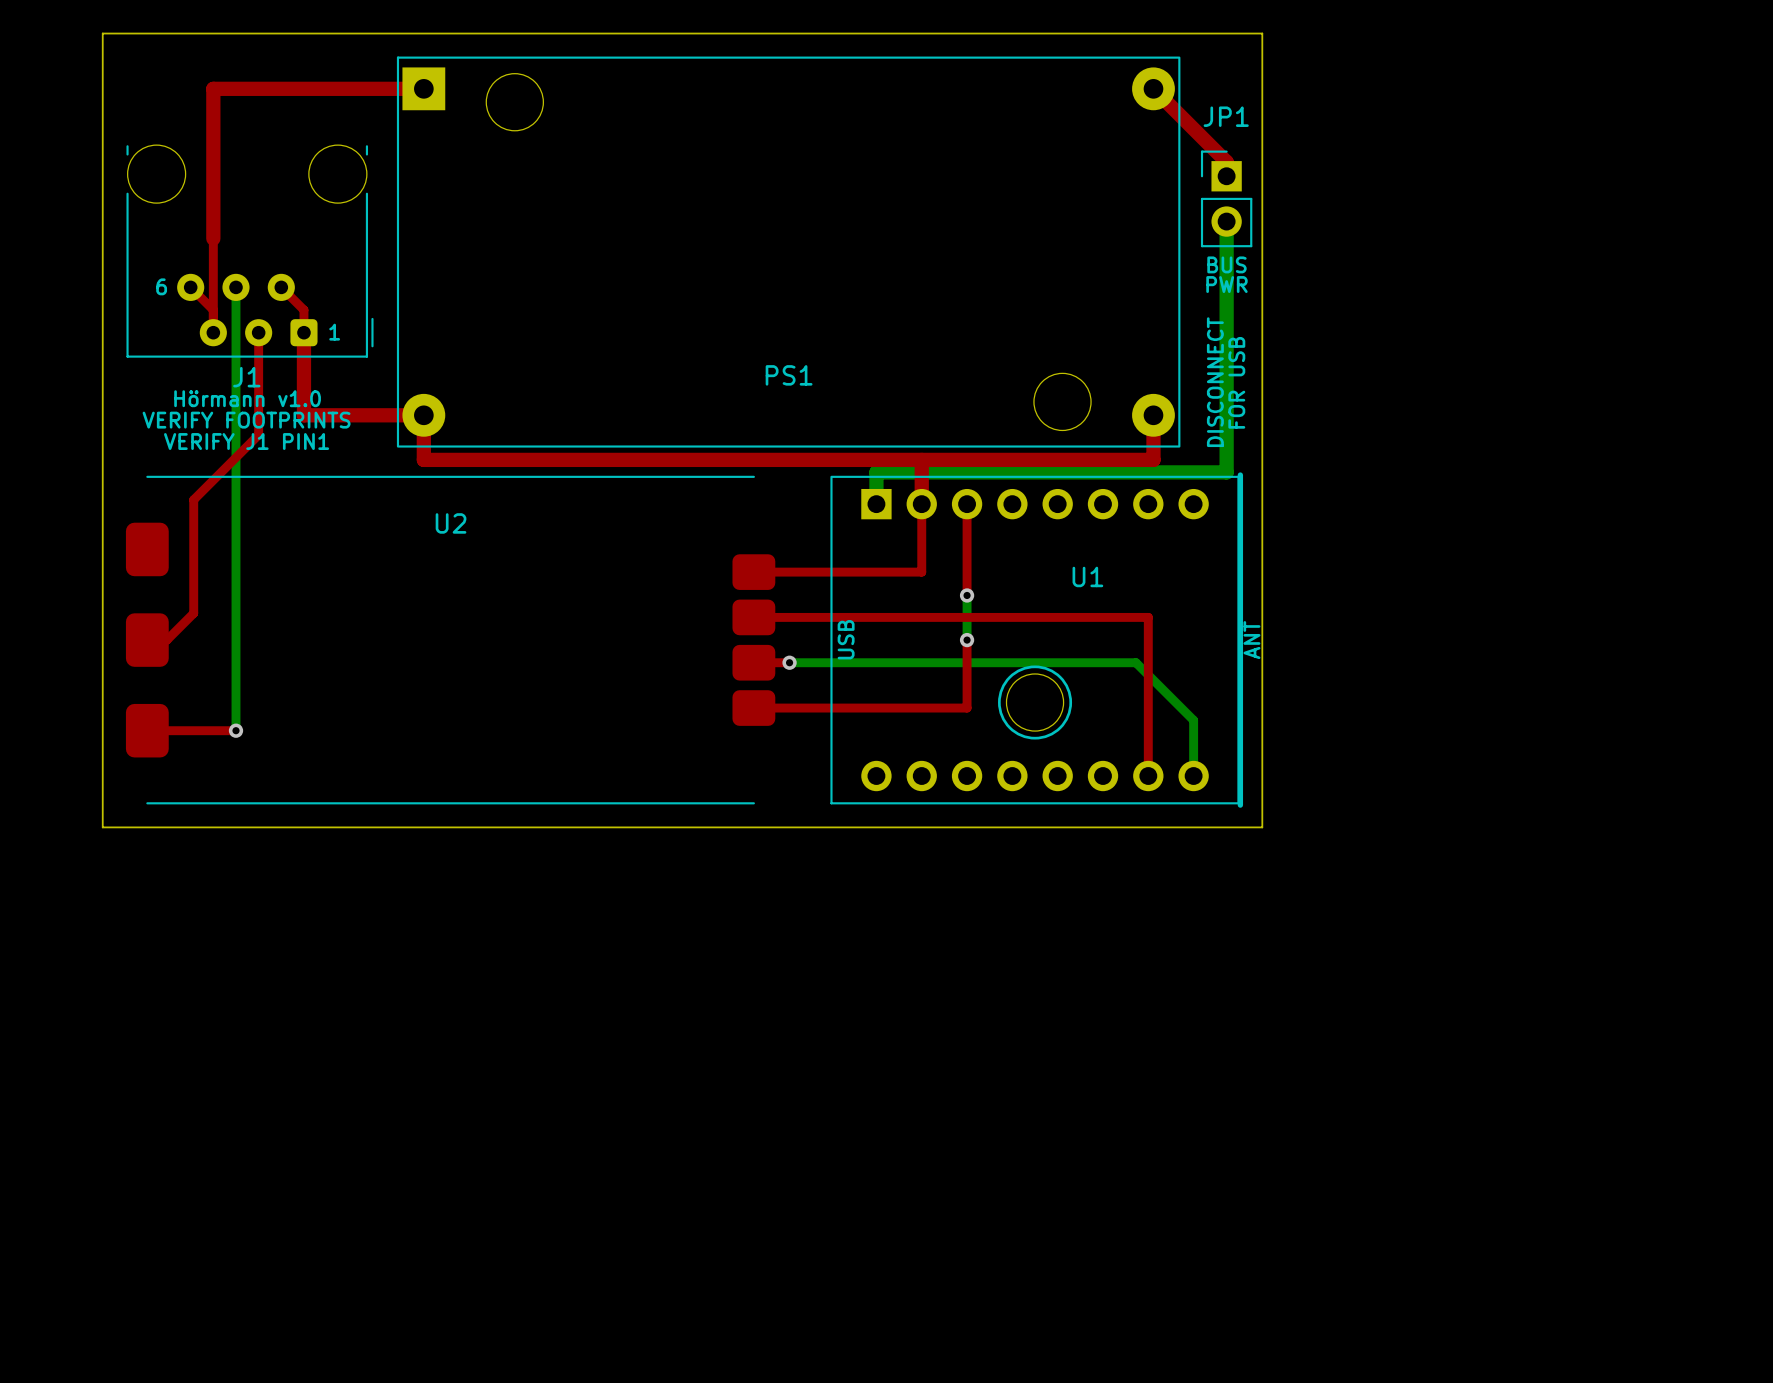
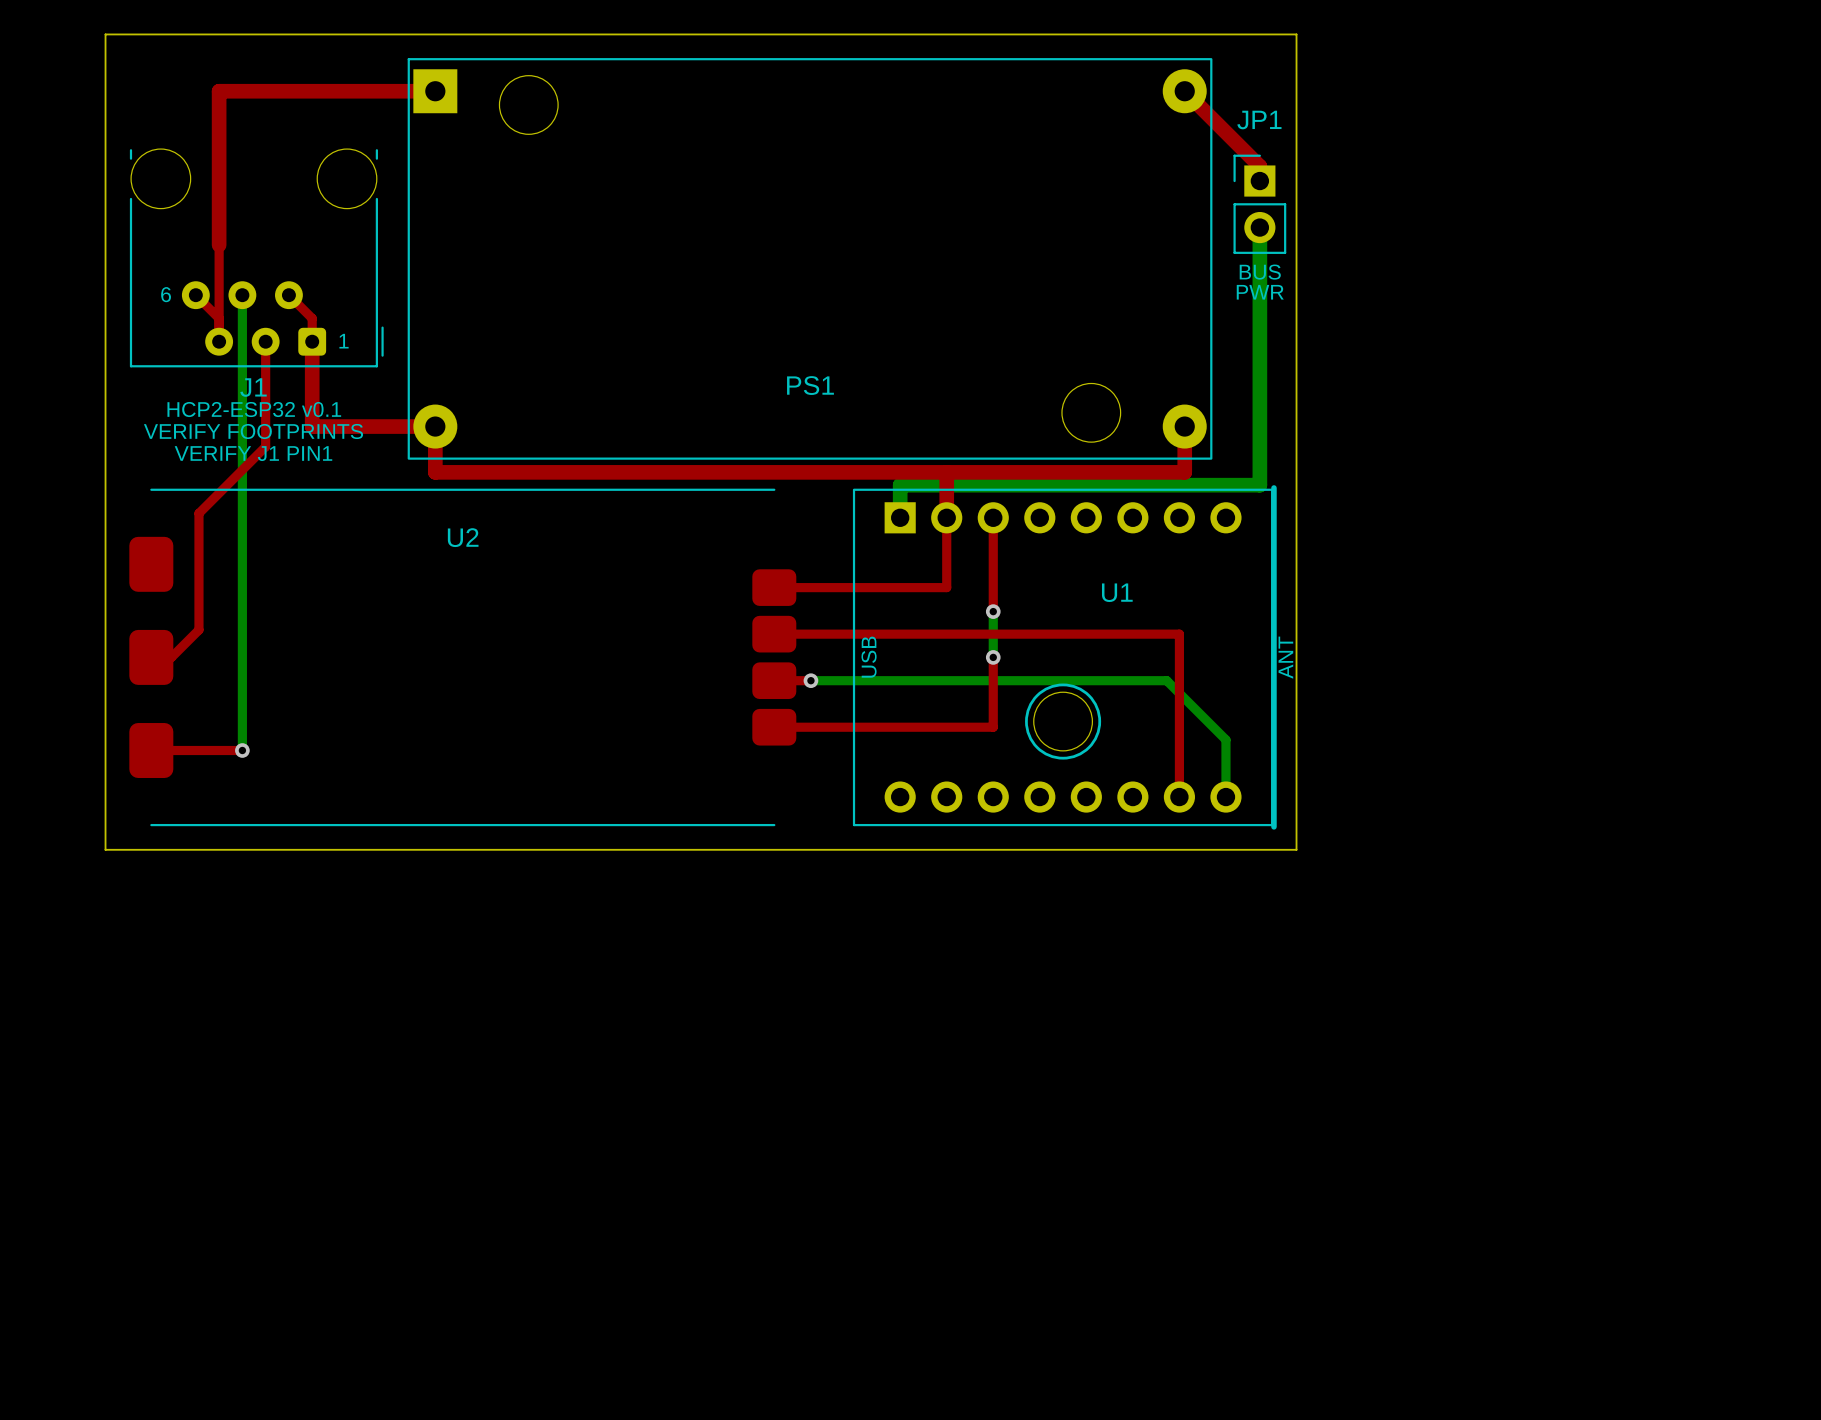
text: DISCONNECT (1215, 382) -> none
text: FOR USB (1236, 382) -> none
text: Hörmann v1.0 (247, 398) -> HCP2-ESP32 v0.1 (254, 409)

